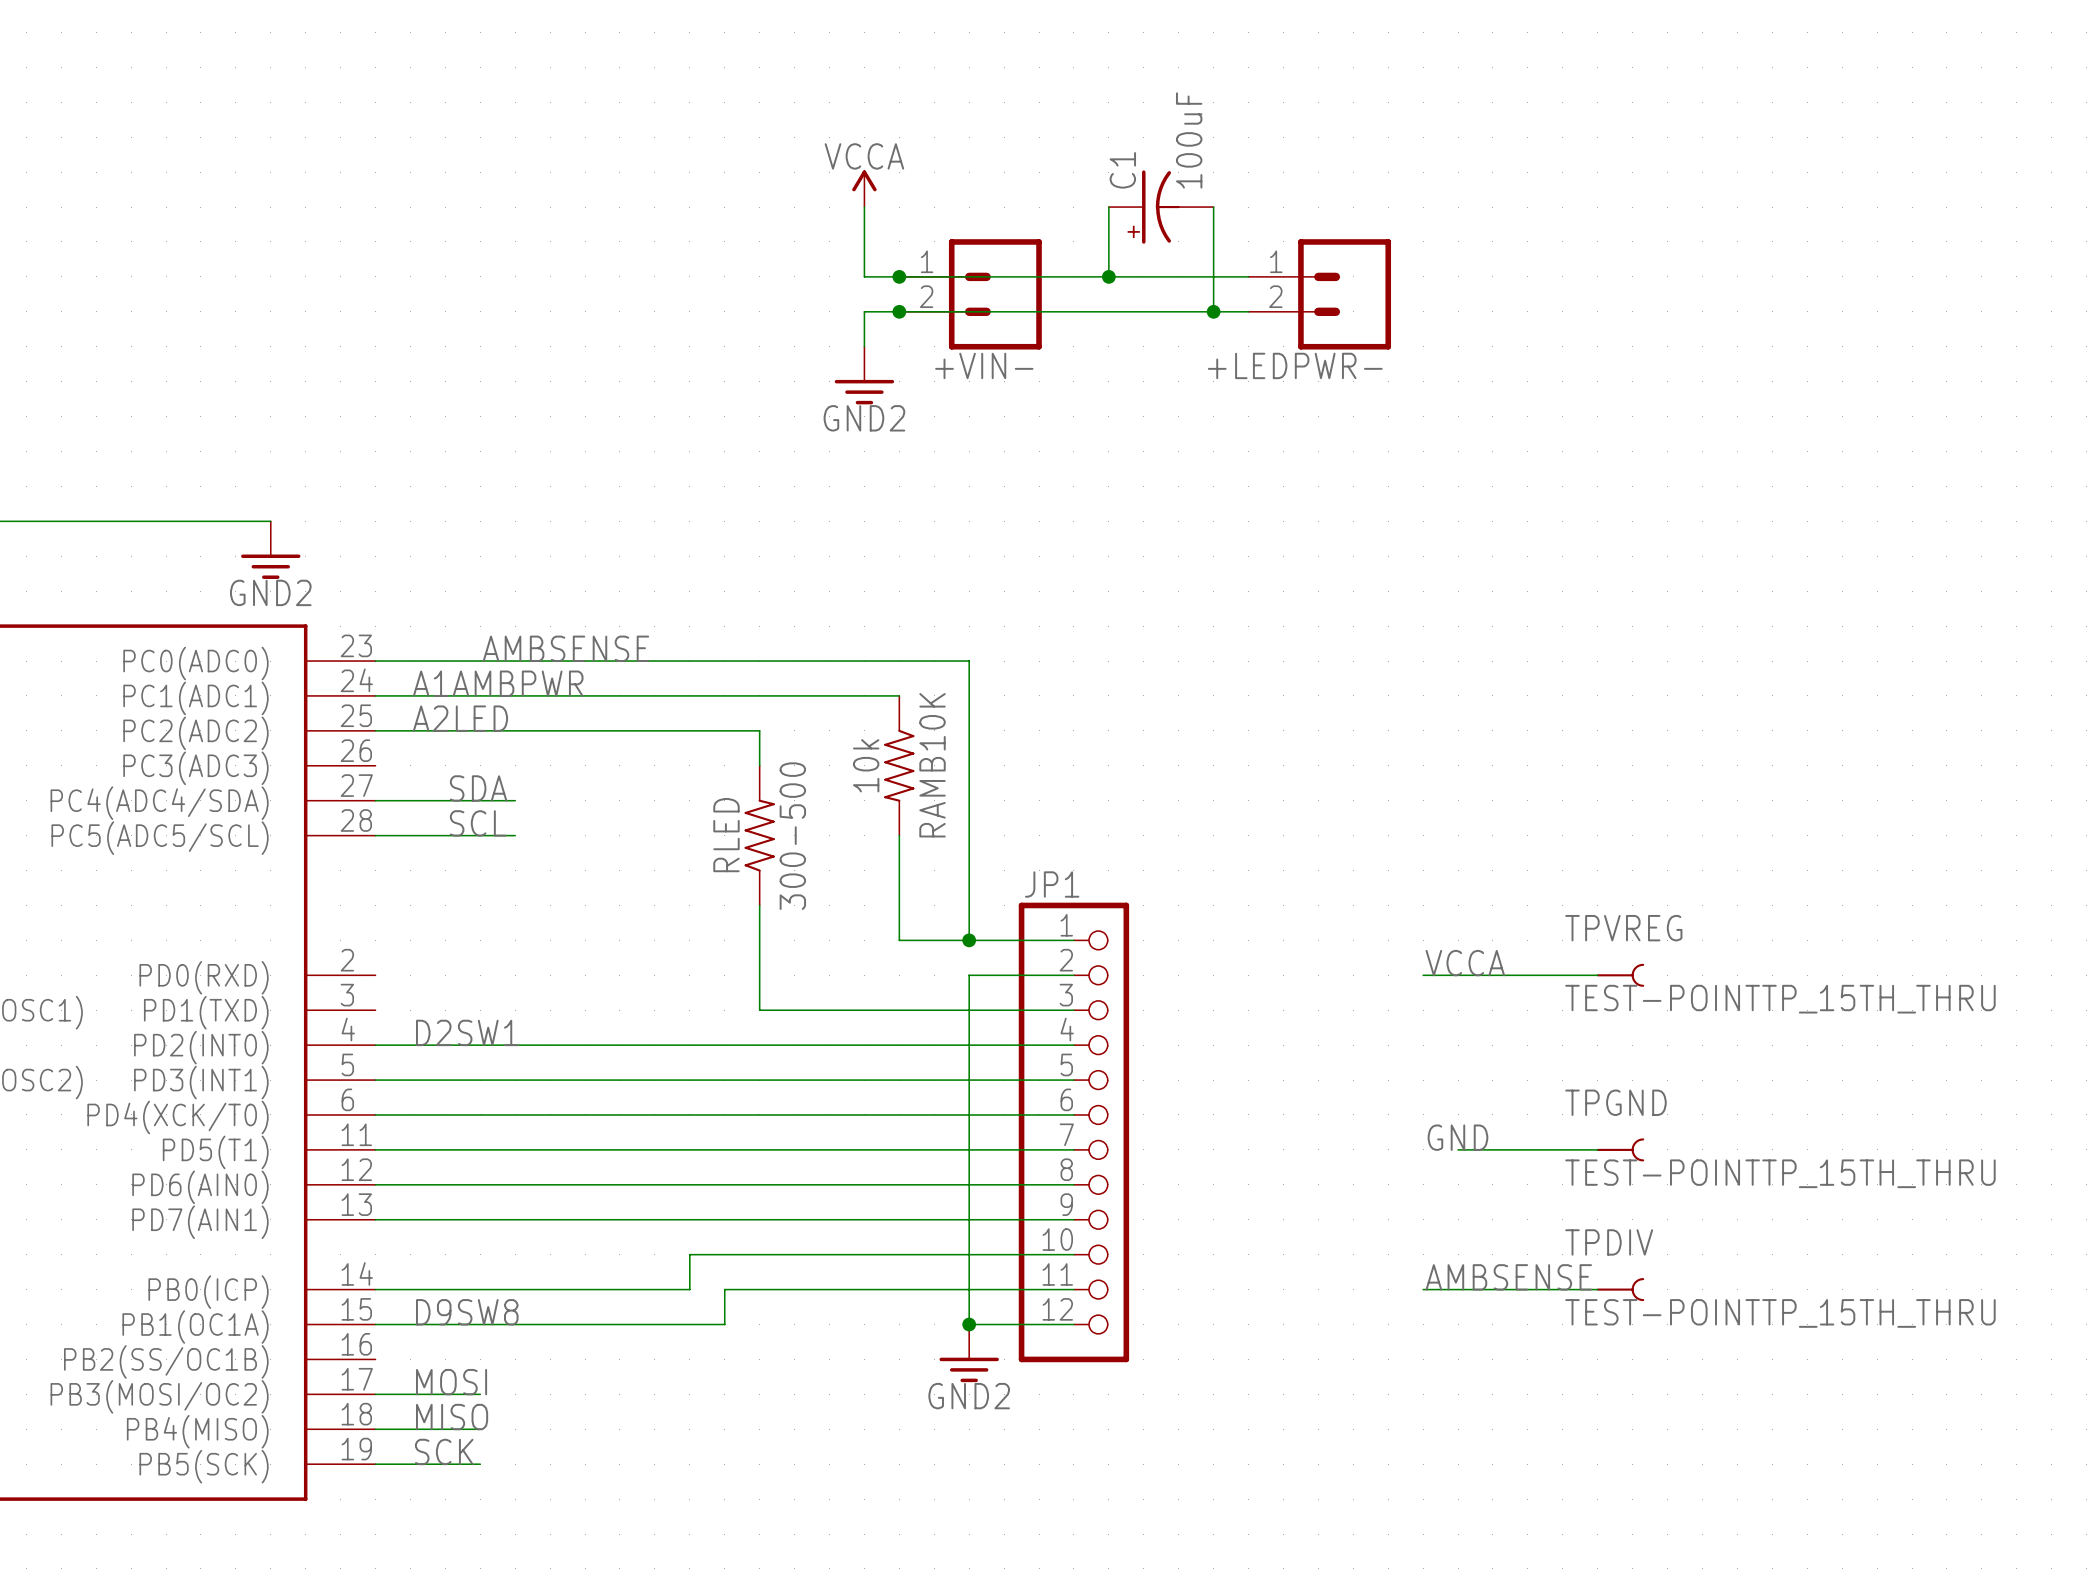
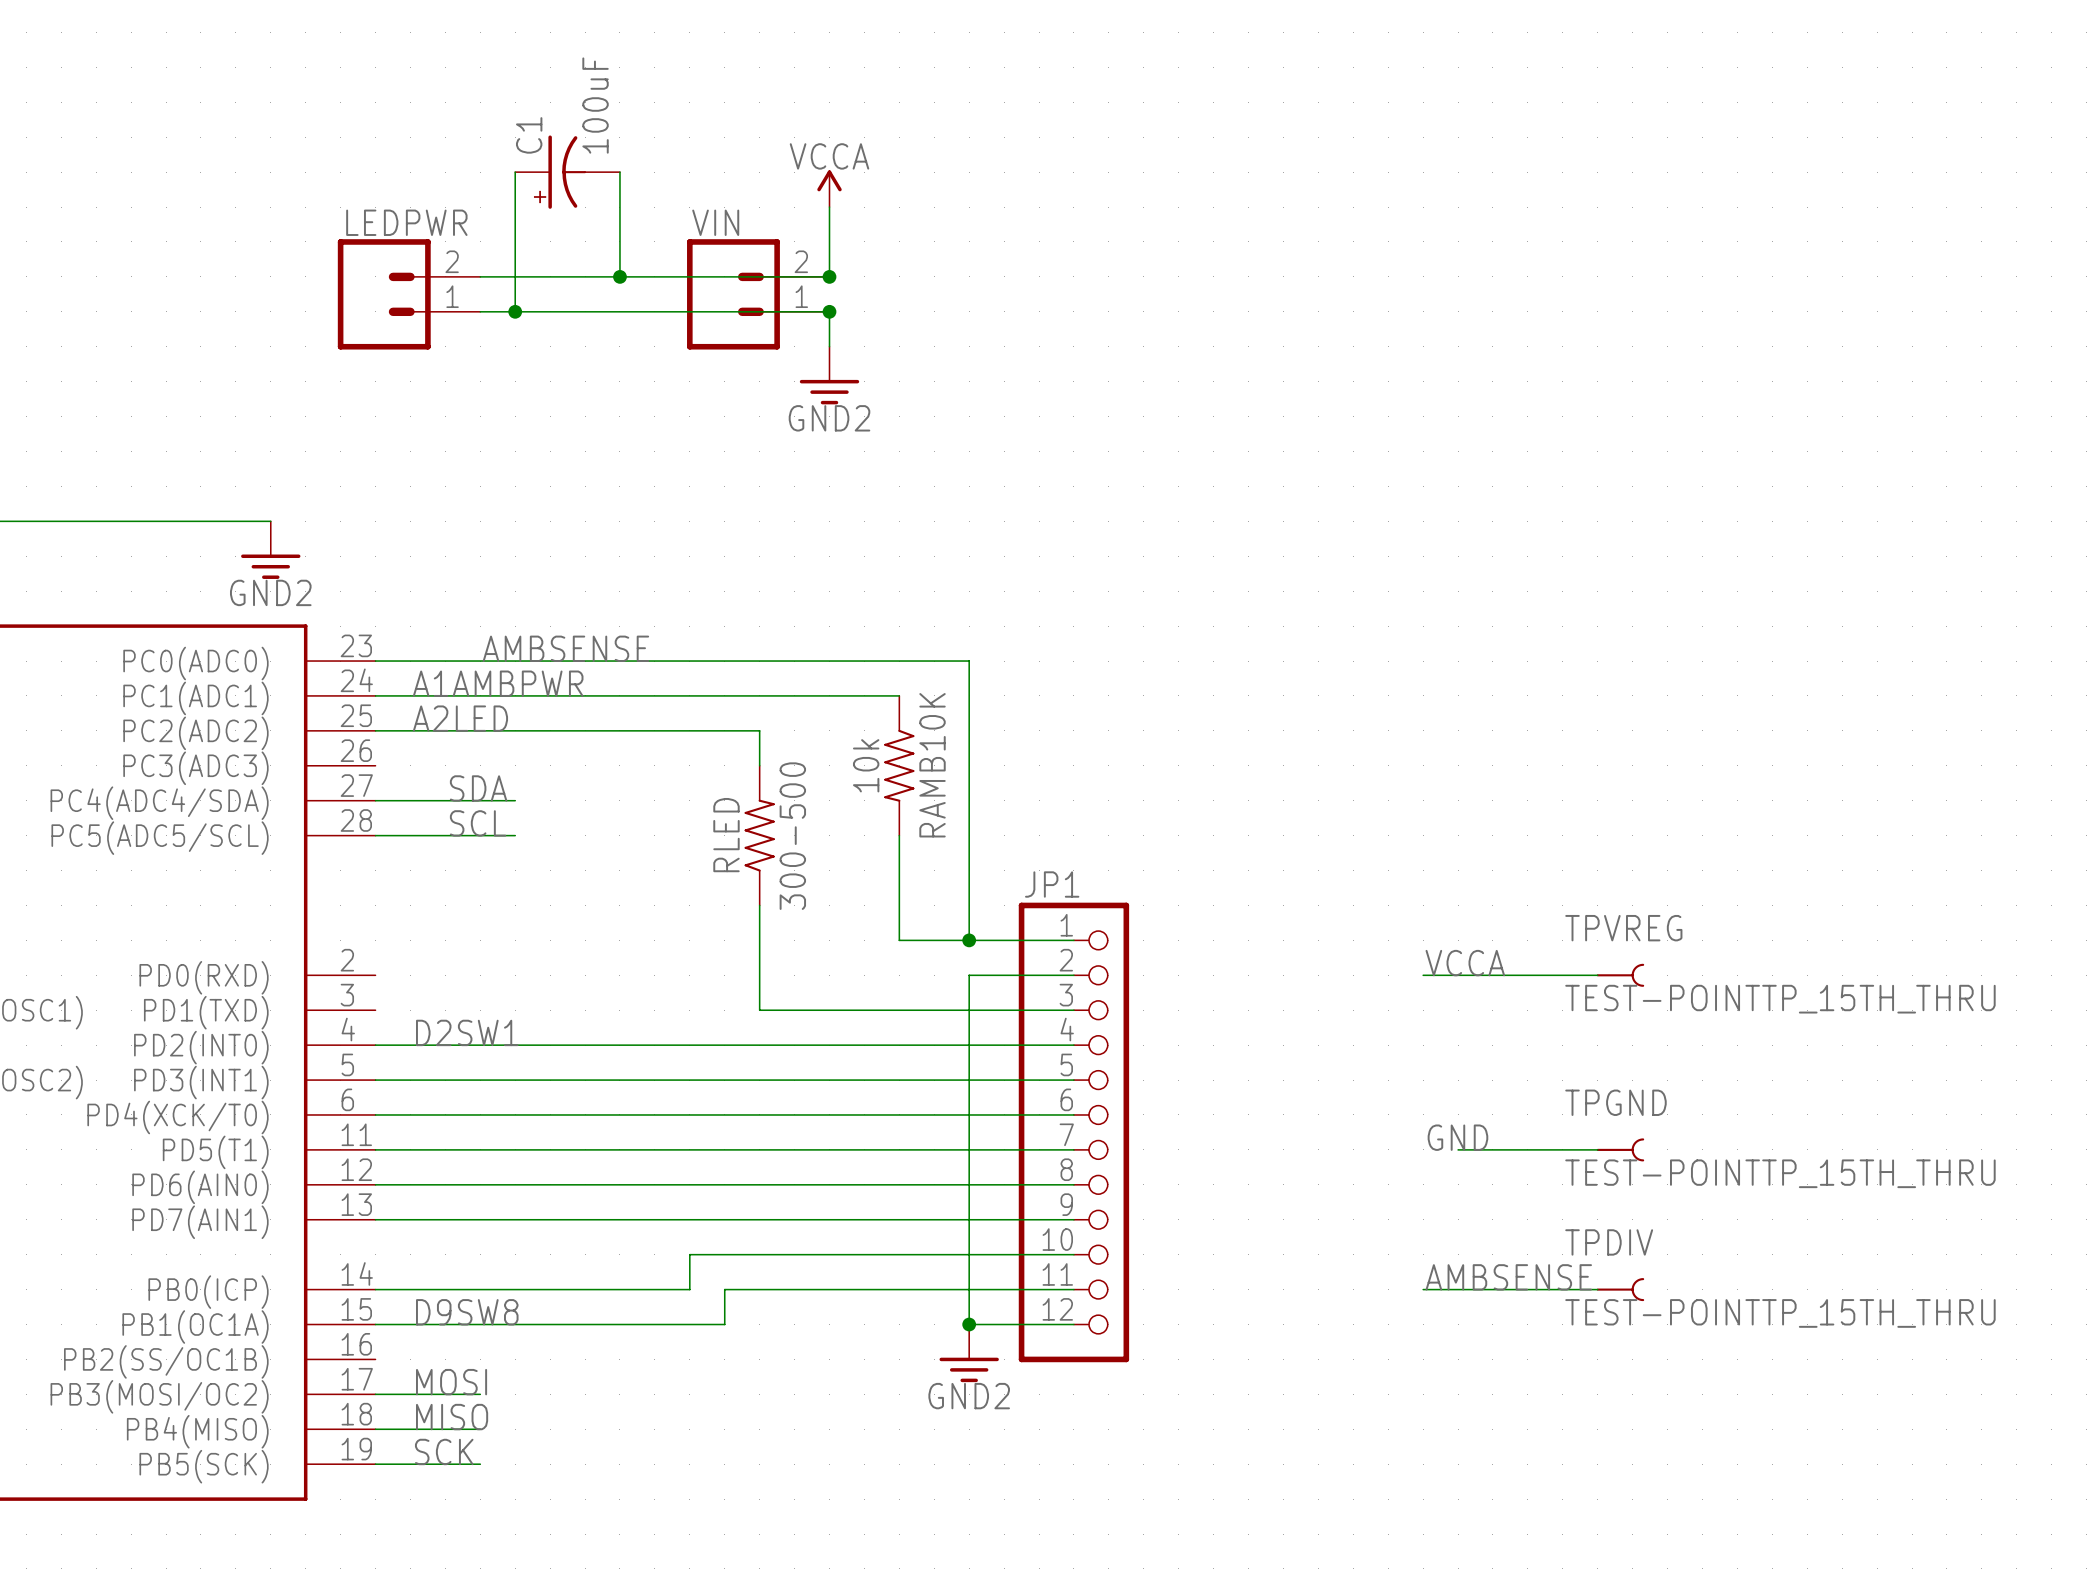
wire: none -> (515, 172) (515, 311)
wire: none -> (619, 172) (619, 276)
power symbol position: VCCA (864, 188) -> VCCA (829, 188)
wire: none -> (829, 207) (829, 276) (480, 276)
wire: (864, 207) (864, 276) (1248, 276) -> none
wire: (1108, 207) (1108, 276) -> none
C1 position: (1161, 207) -> (567, 172)
wire: (1213, 207) (1213, 311) -> none
junction: none -> (619, 276)
junction: none -> (829, 276)
junction: (899, 276) -> none
junction: (1108, 276) -> none
LEDPWR: none -> (409, 294)
VIN: none -> (758, 294)
+VIN-: (970, 294) -> none
+LEDPWR-: (1319, 294) -> none
wire: none -> (480, 311) (829, 311) (829, 346)
junction: none -> (515, 311)
junction: none -> (829, 311)
junction: (899, 311) -> none
junction: (1213, 311) -> none
wire: (1248, 311) (864, 311) (864, 346) -> none
power symbol position: GND2 (864, 375) -> GND2 (829, 375)

